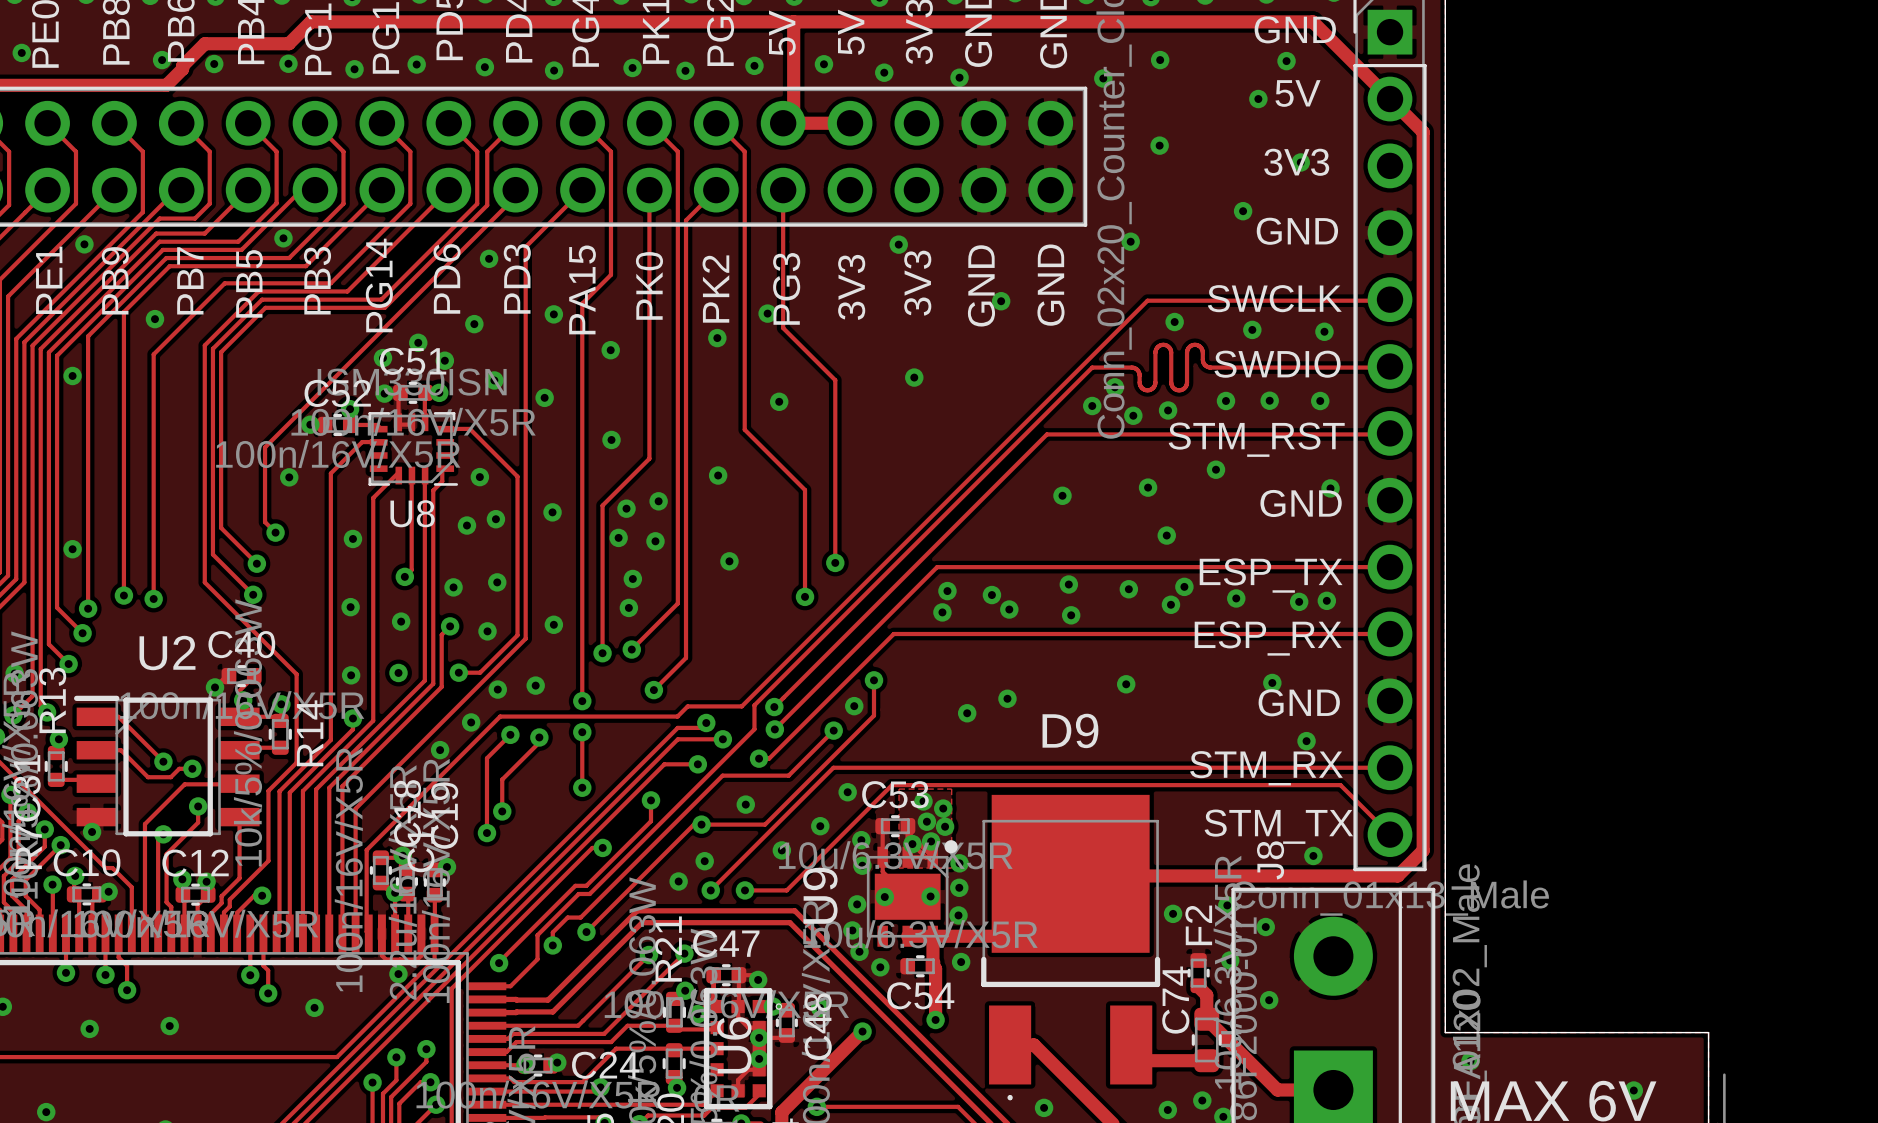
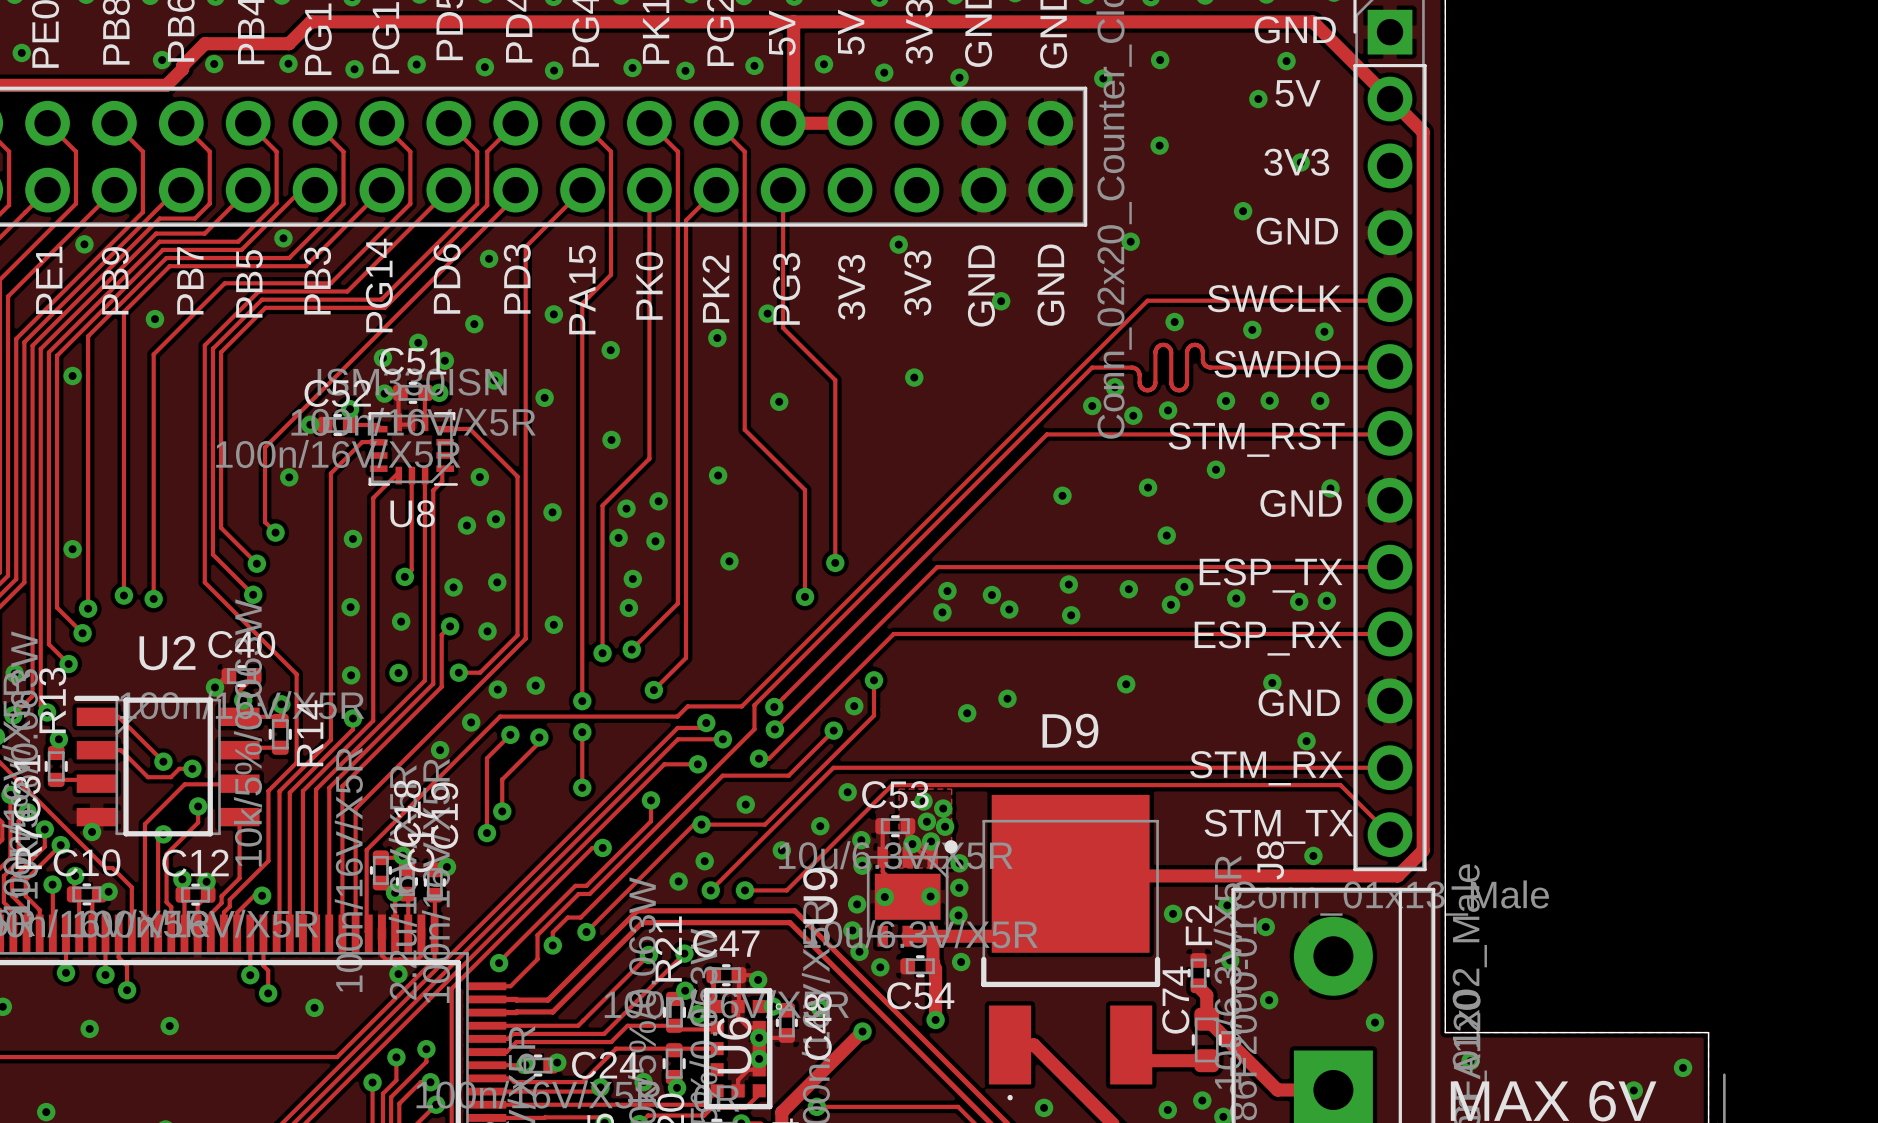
via: none -> (1375, 1022)
via: none -> (1683, 1067)
via: none -> (643, 1082)

